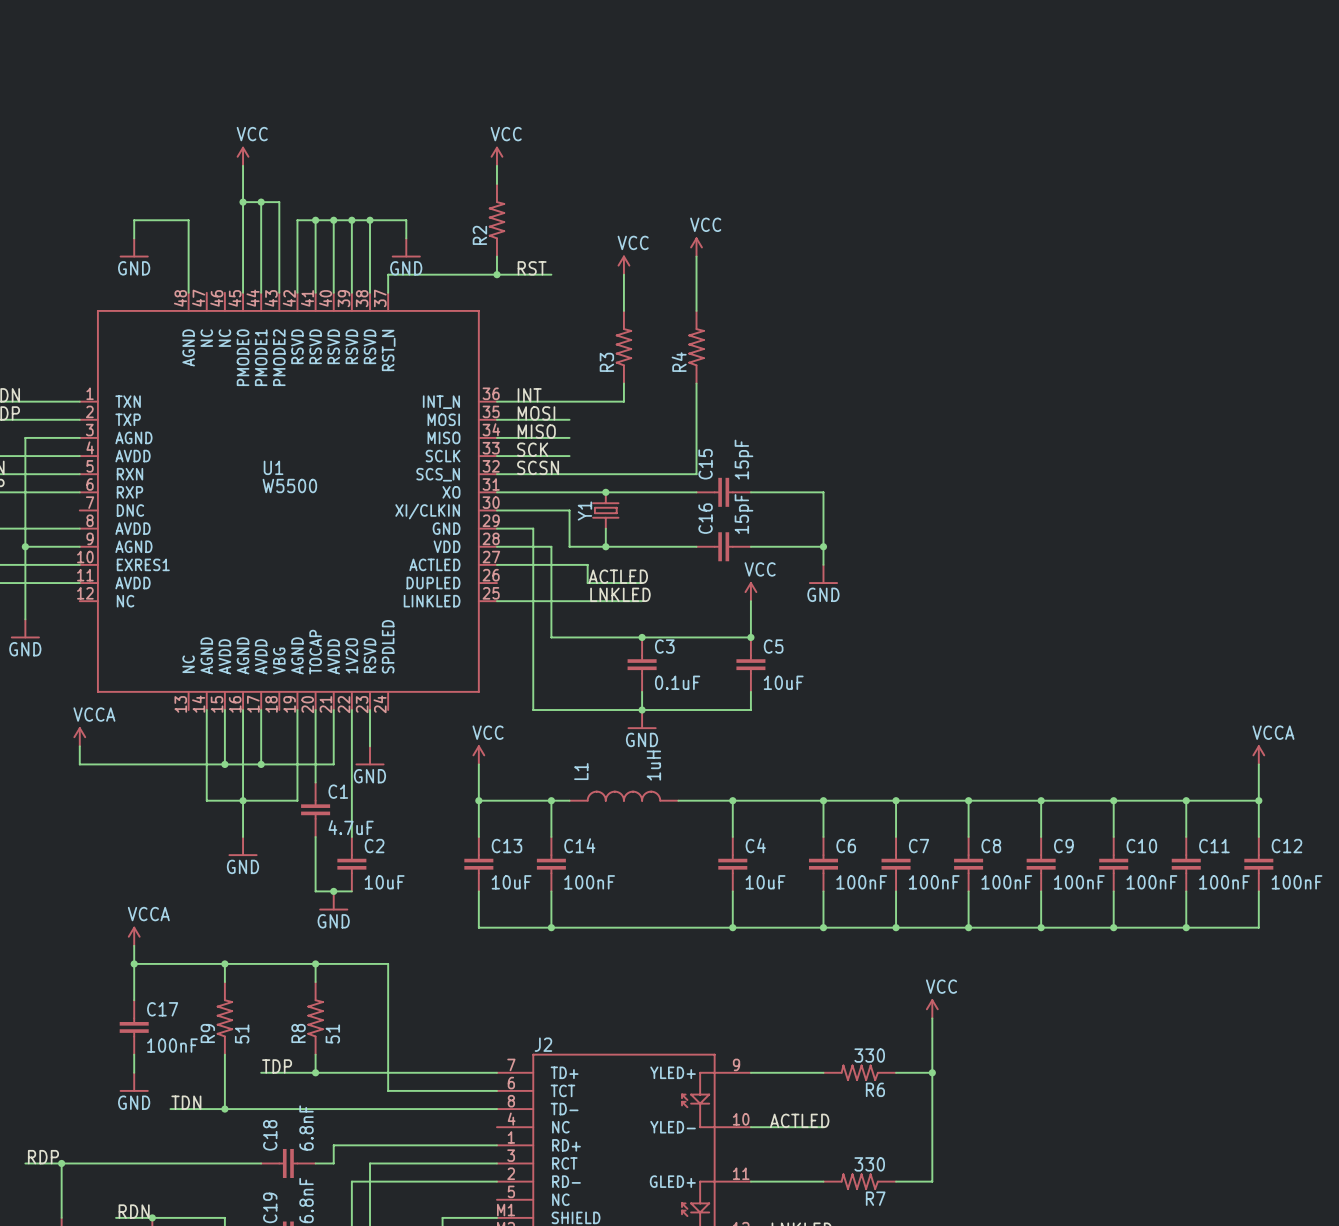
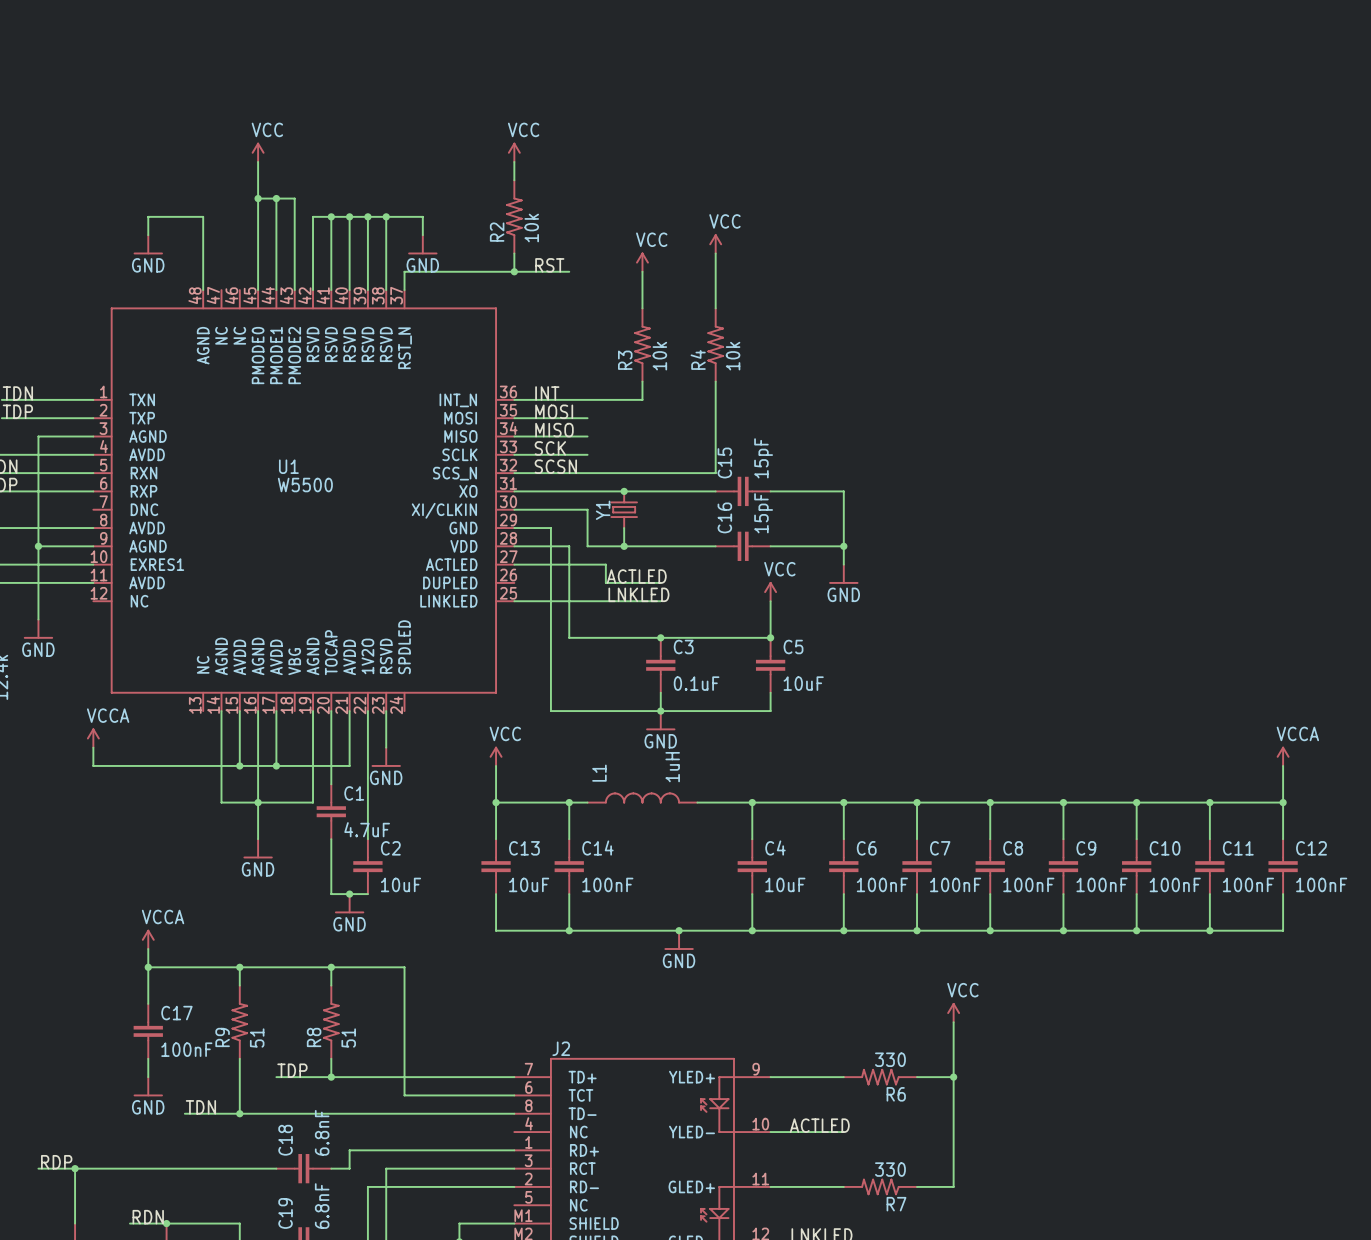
R2 value: none -> 10k (531, 227)
R3 value: none -> 10k (659, 356)
R4 value: none -> 10k (733, 356)
junction: none -> (679, 930)
power symbol: none -> GND (679, 940)

